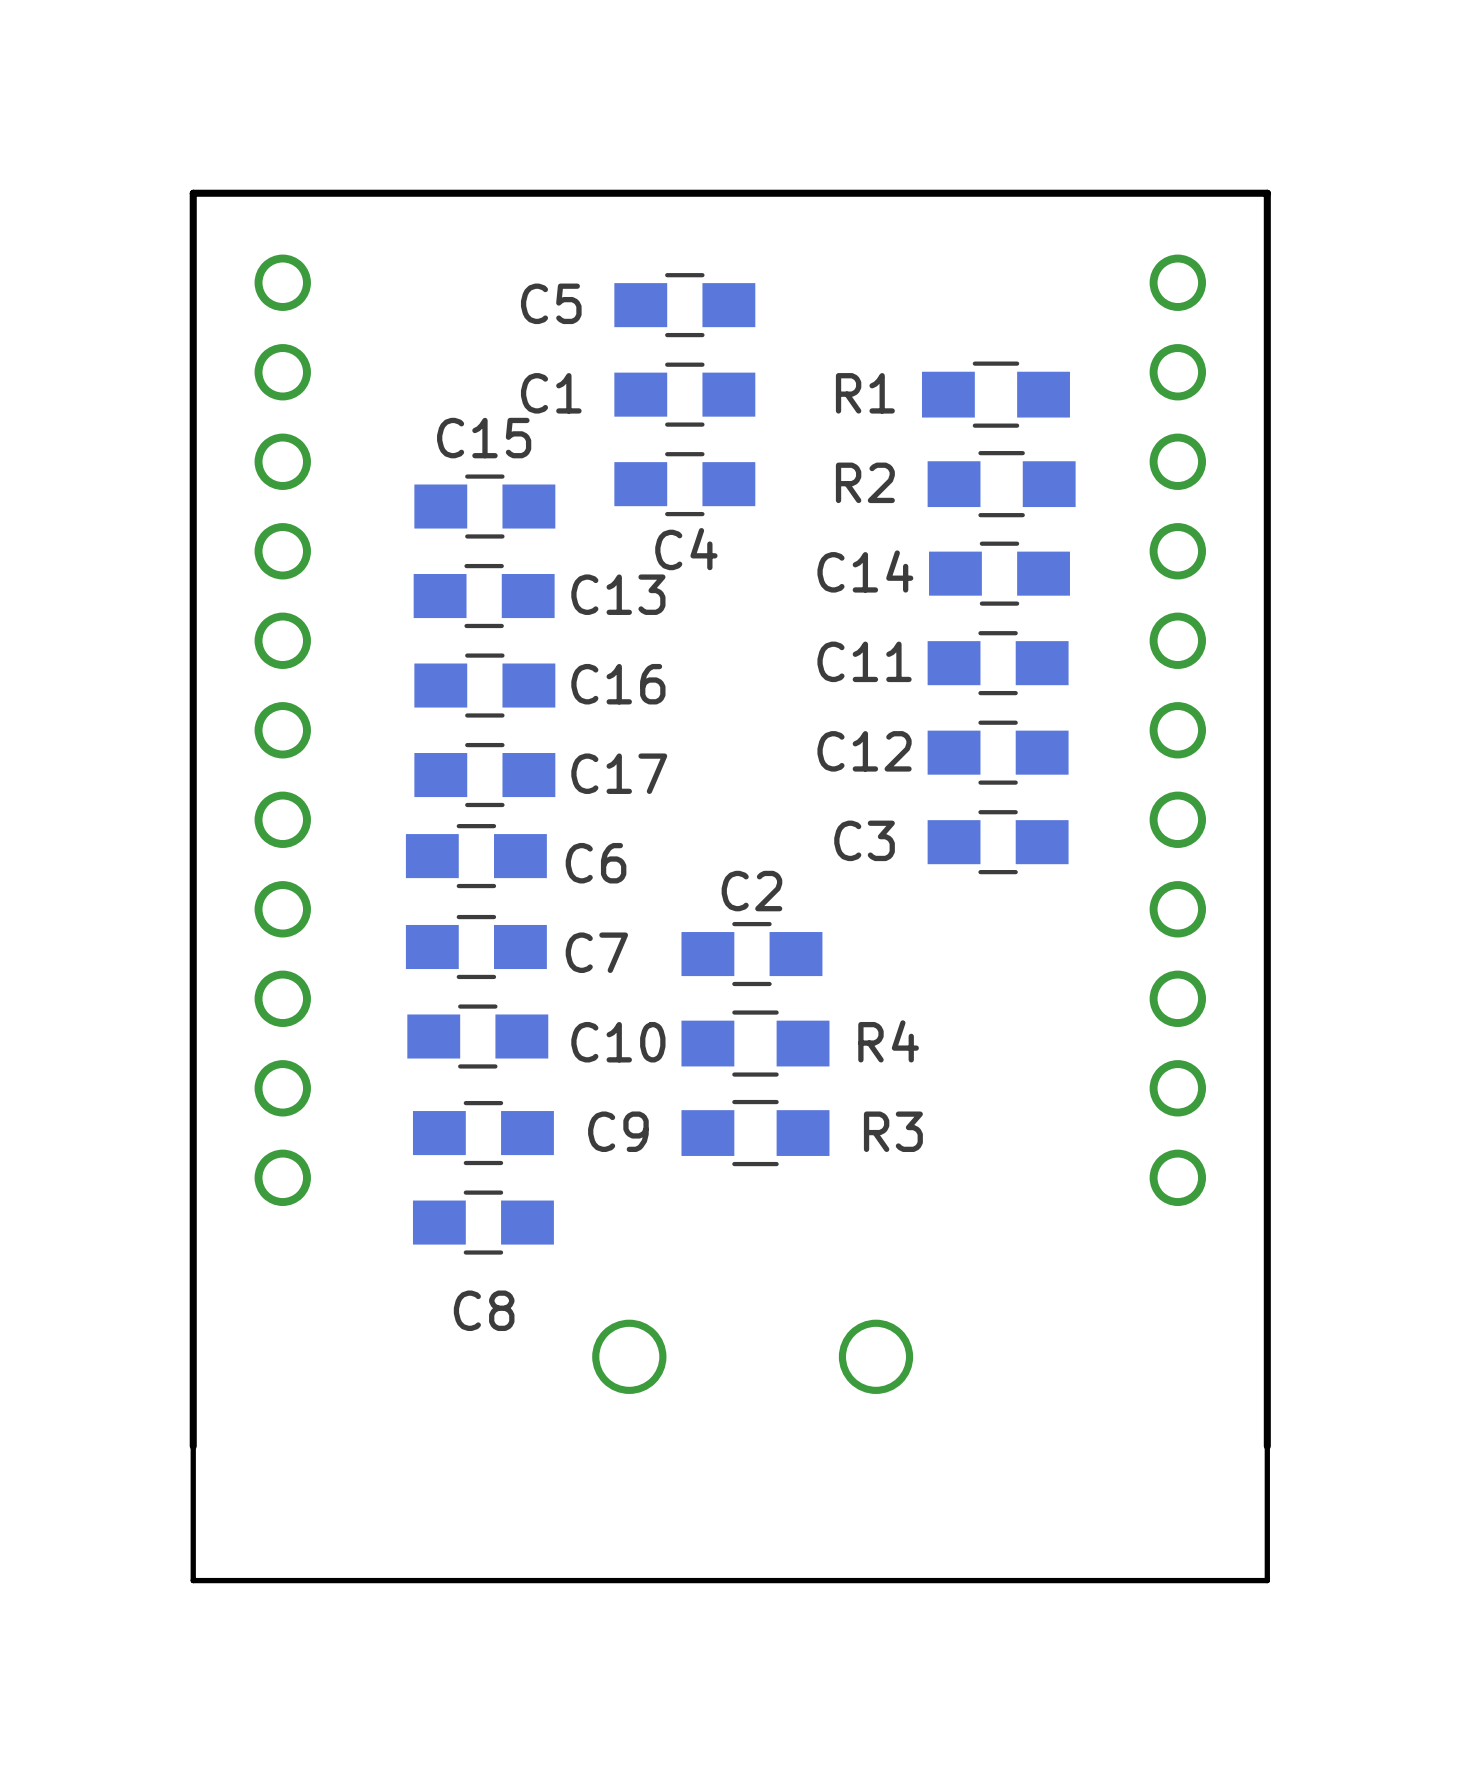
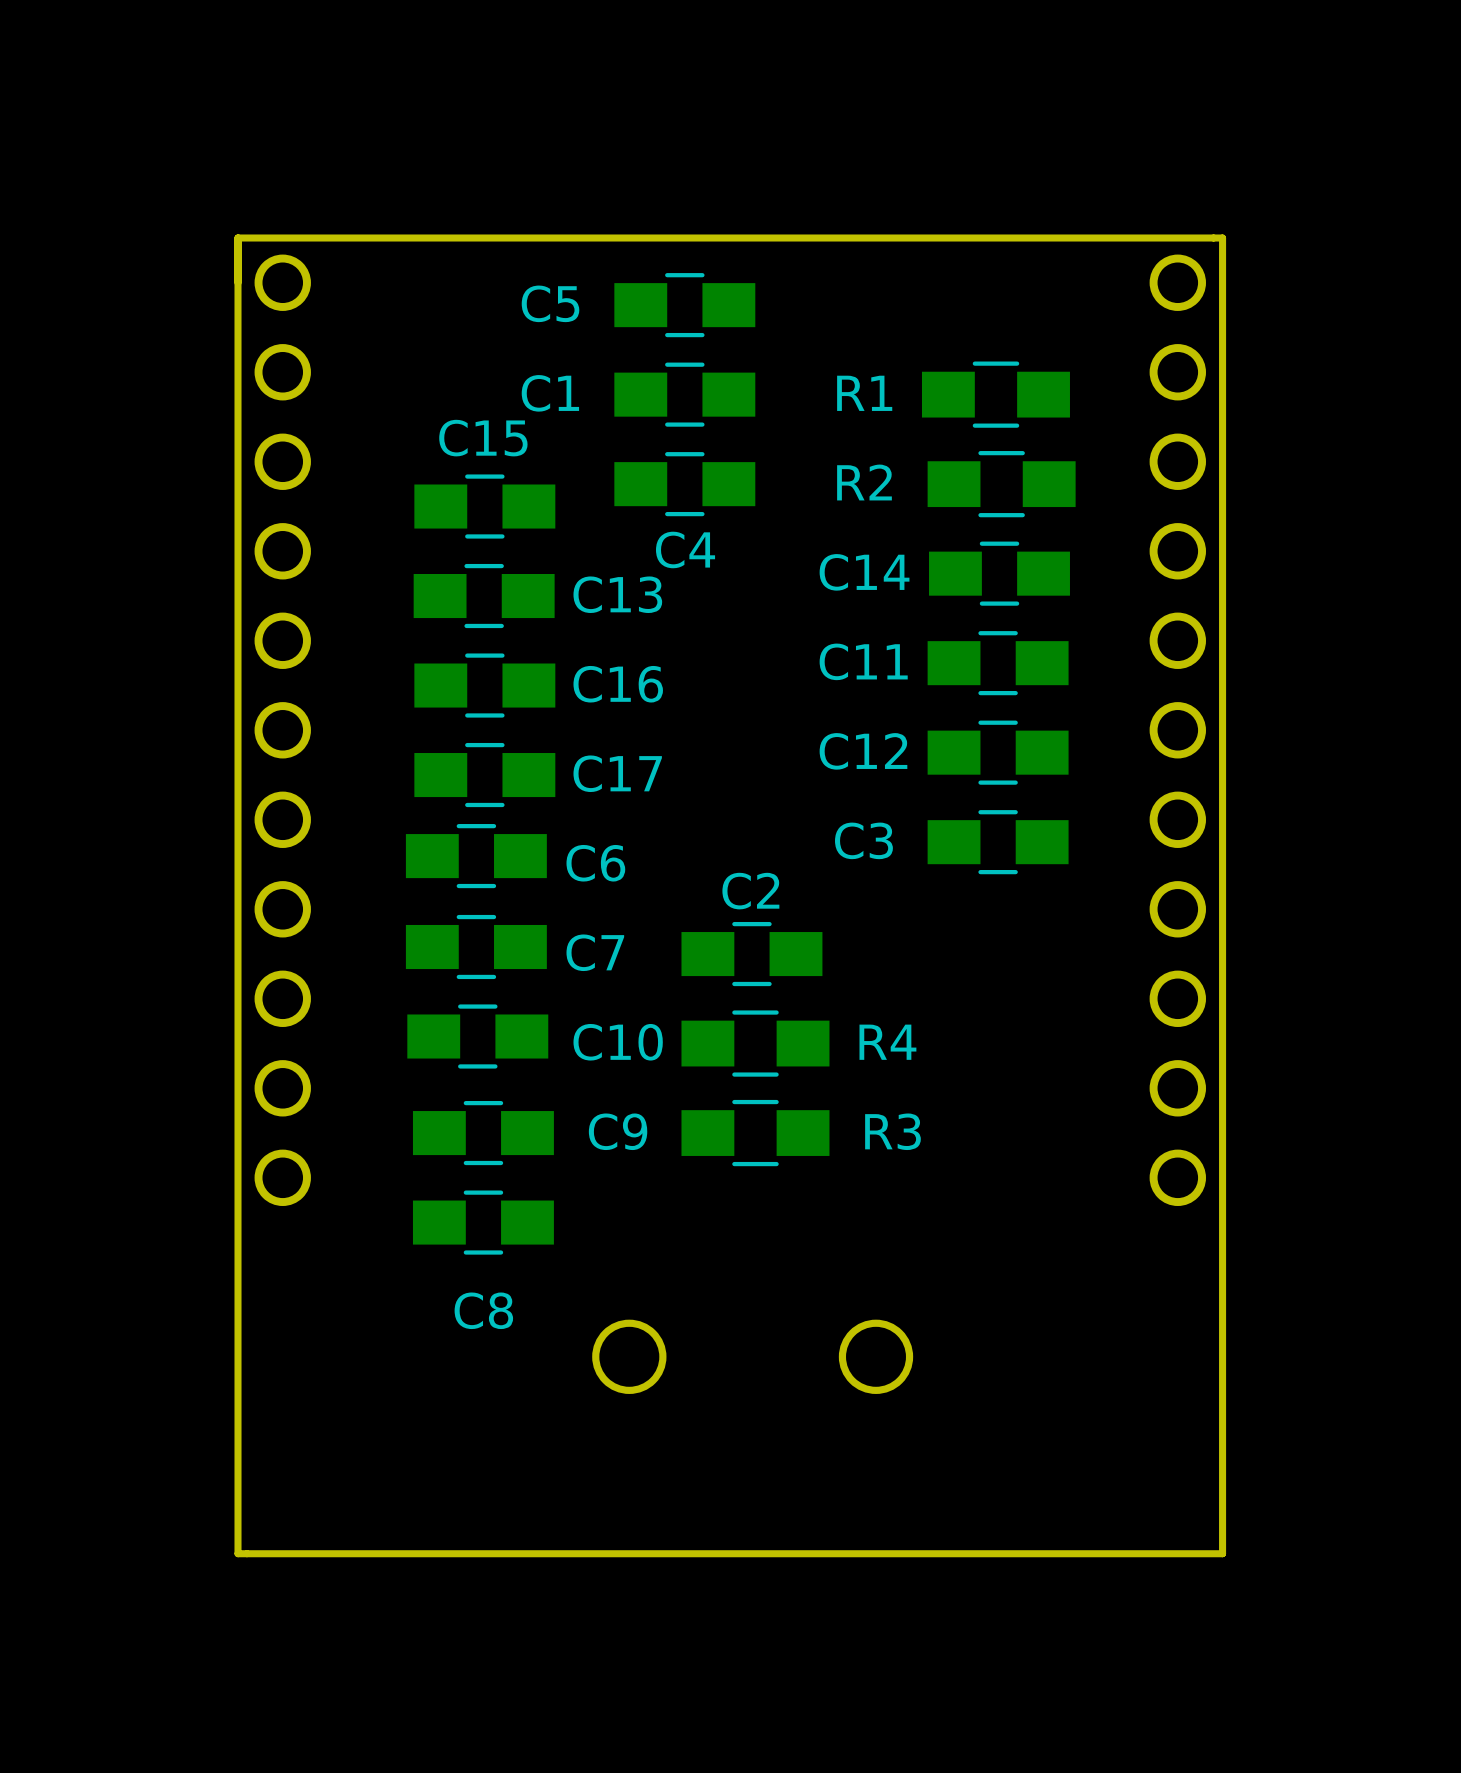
board edge: (1267, 193) (193, 193) (193, 1580) (1267, 1580) (1267, 193) -> (1222, 238) (1222, 1553) (238, 1553) (238, 238) (1222, 238)

